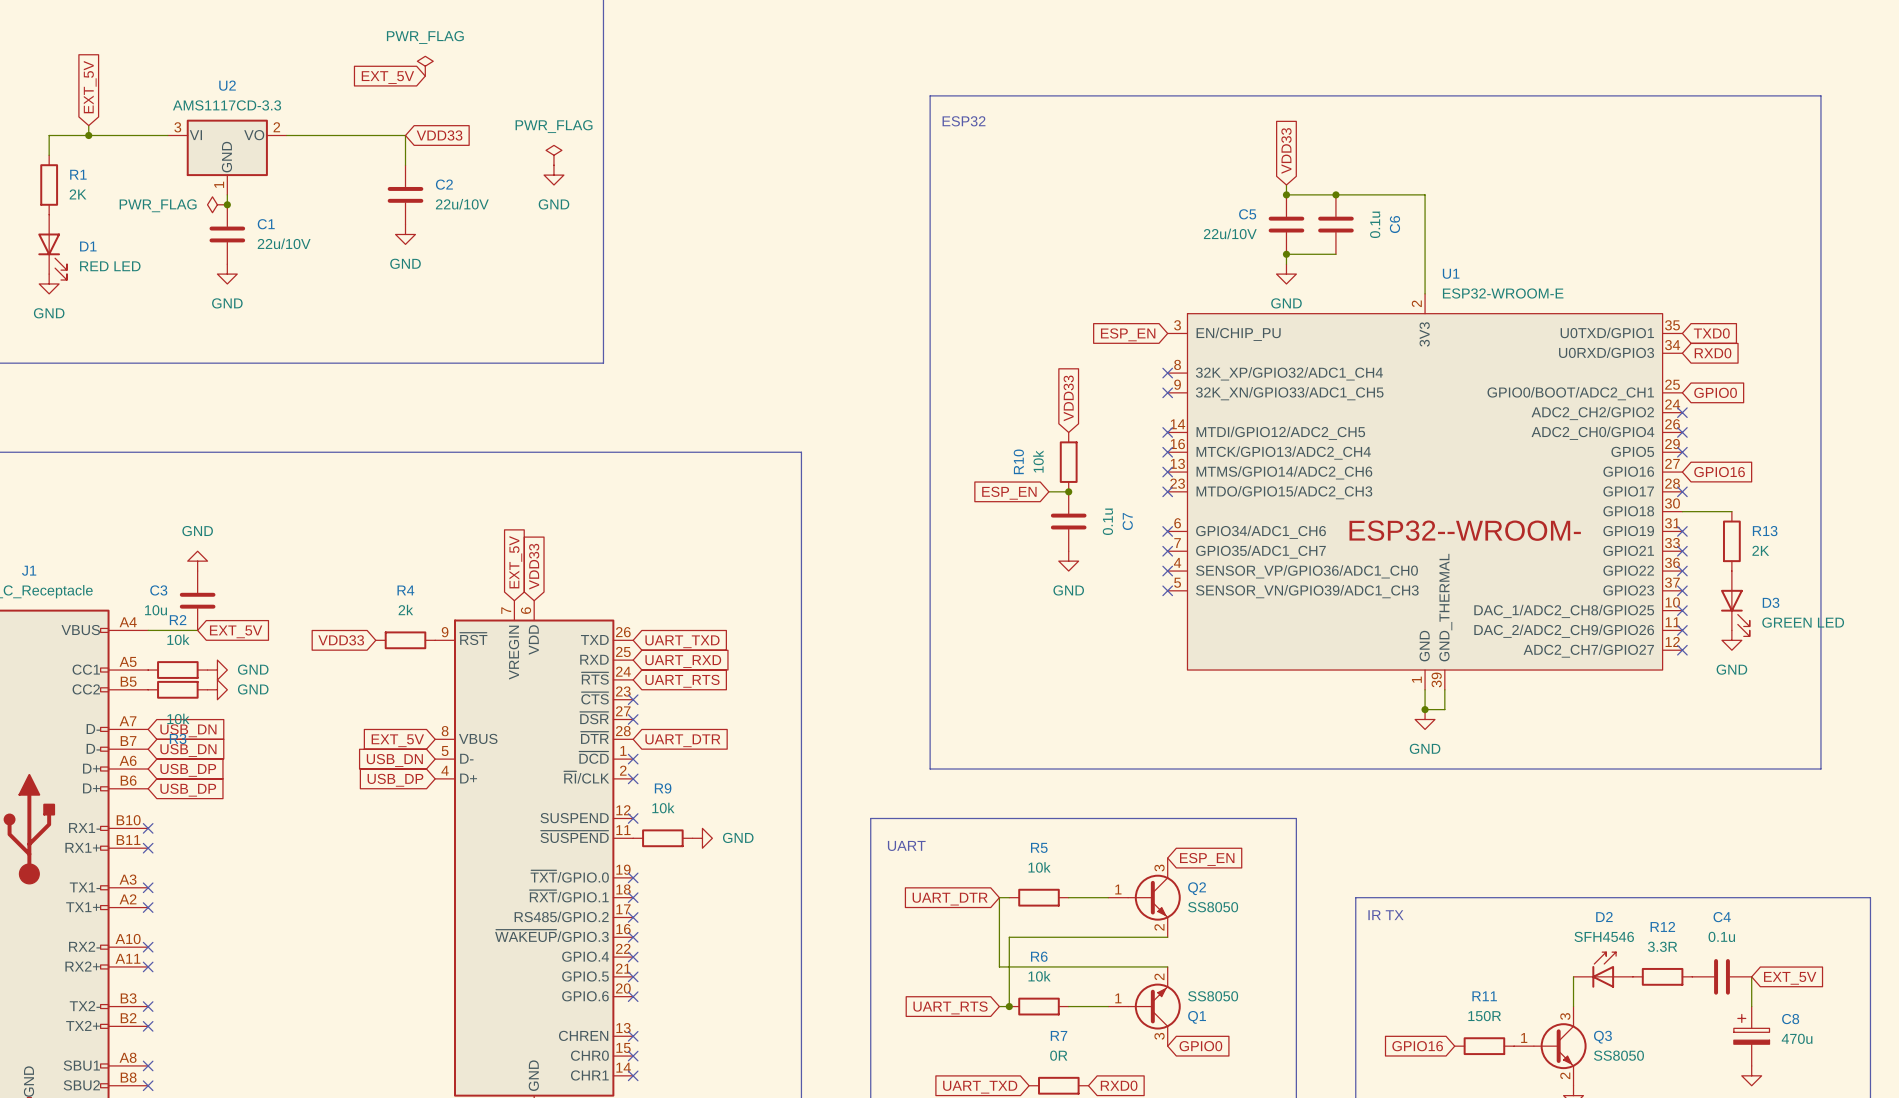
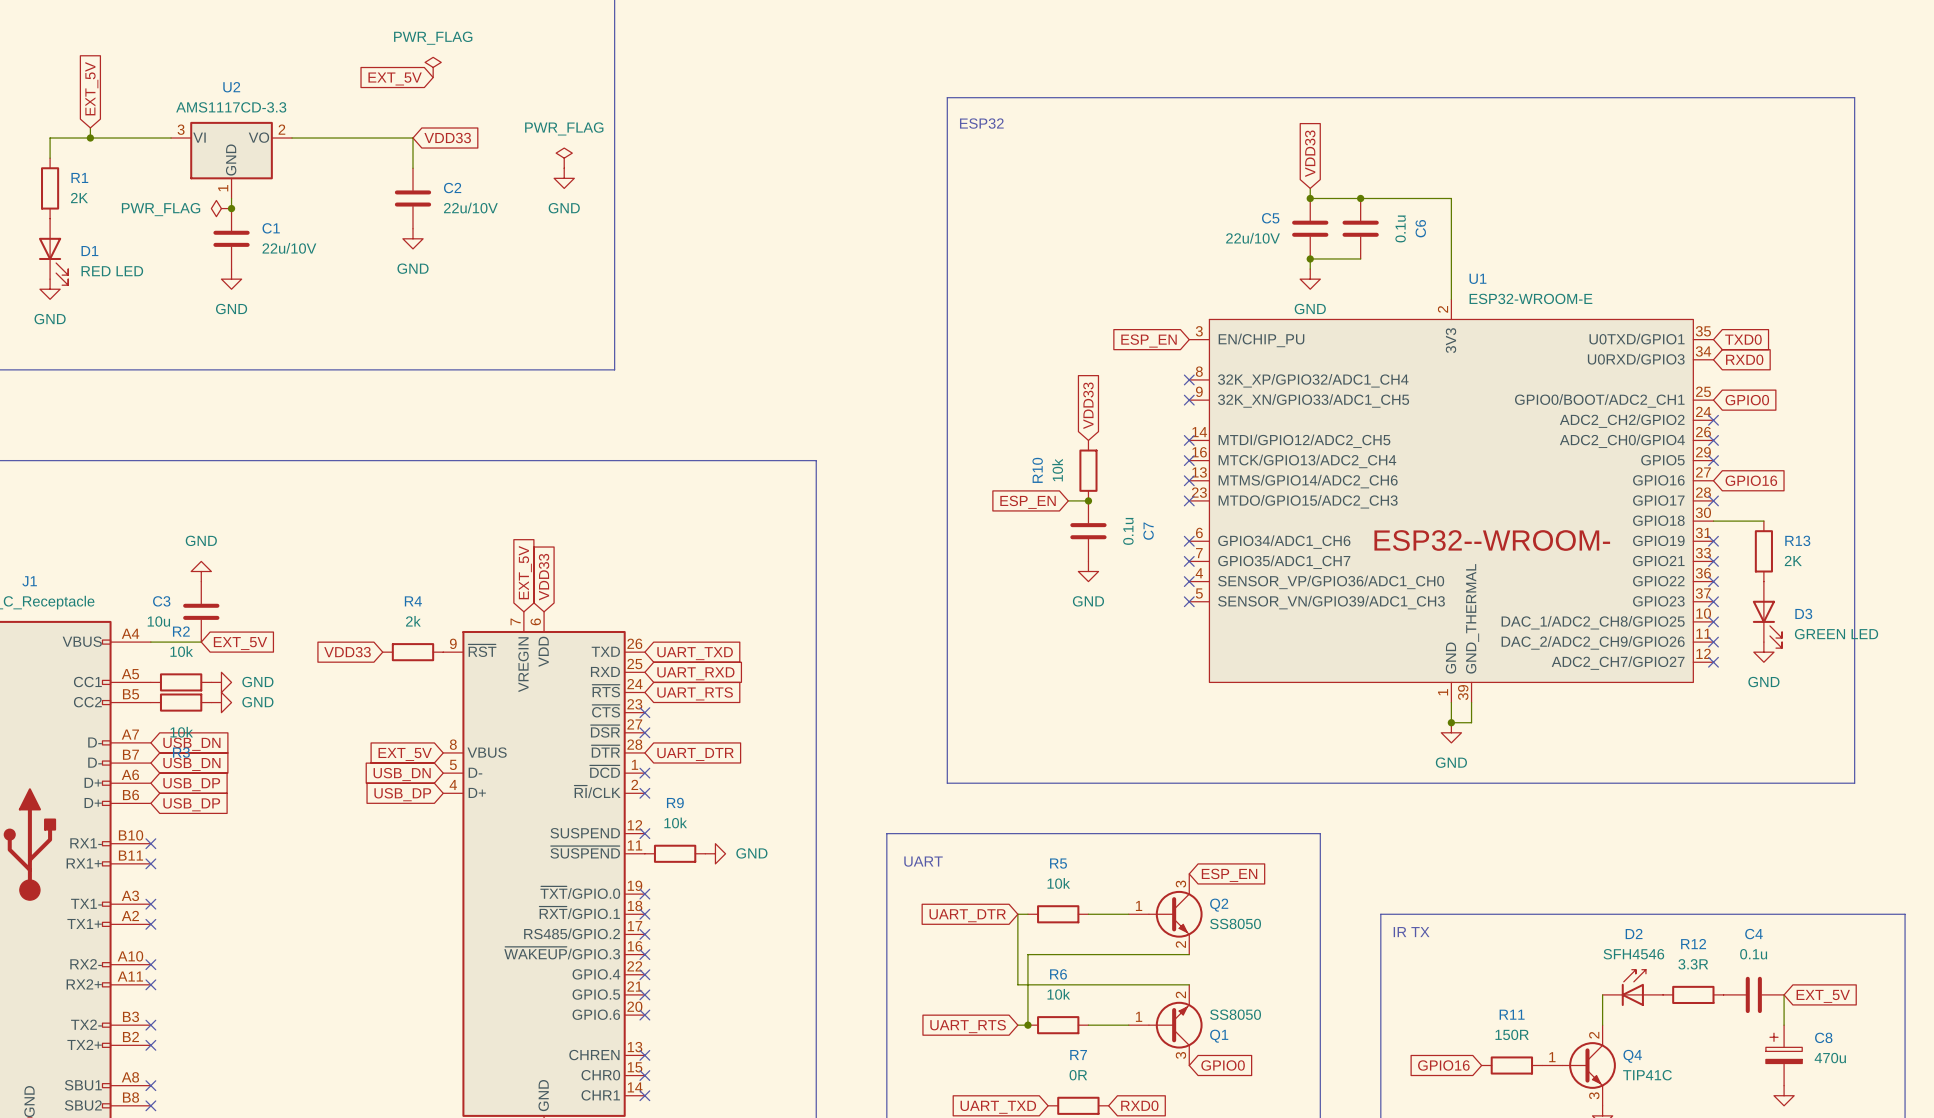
Q3 pin number: 3 (1565, 1016) -> 2 (1594, 1035)
Q3 name: Q3 (1602, 1037) -> Q4 (1632, 1056)
Q3 value: SS8050 (1618, 1055) -> TIP41C (1647, 1075)
Q3 pin number: 2 (1565, 1075) -> 3 (1594, 1095)

